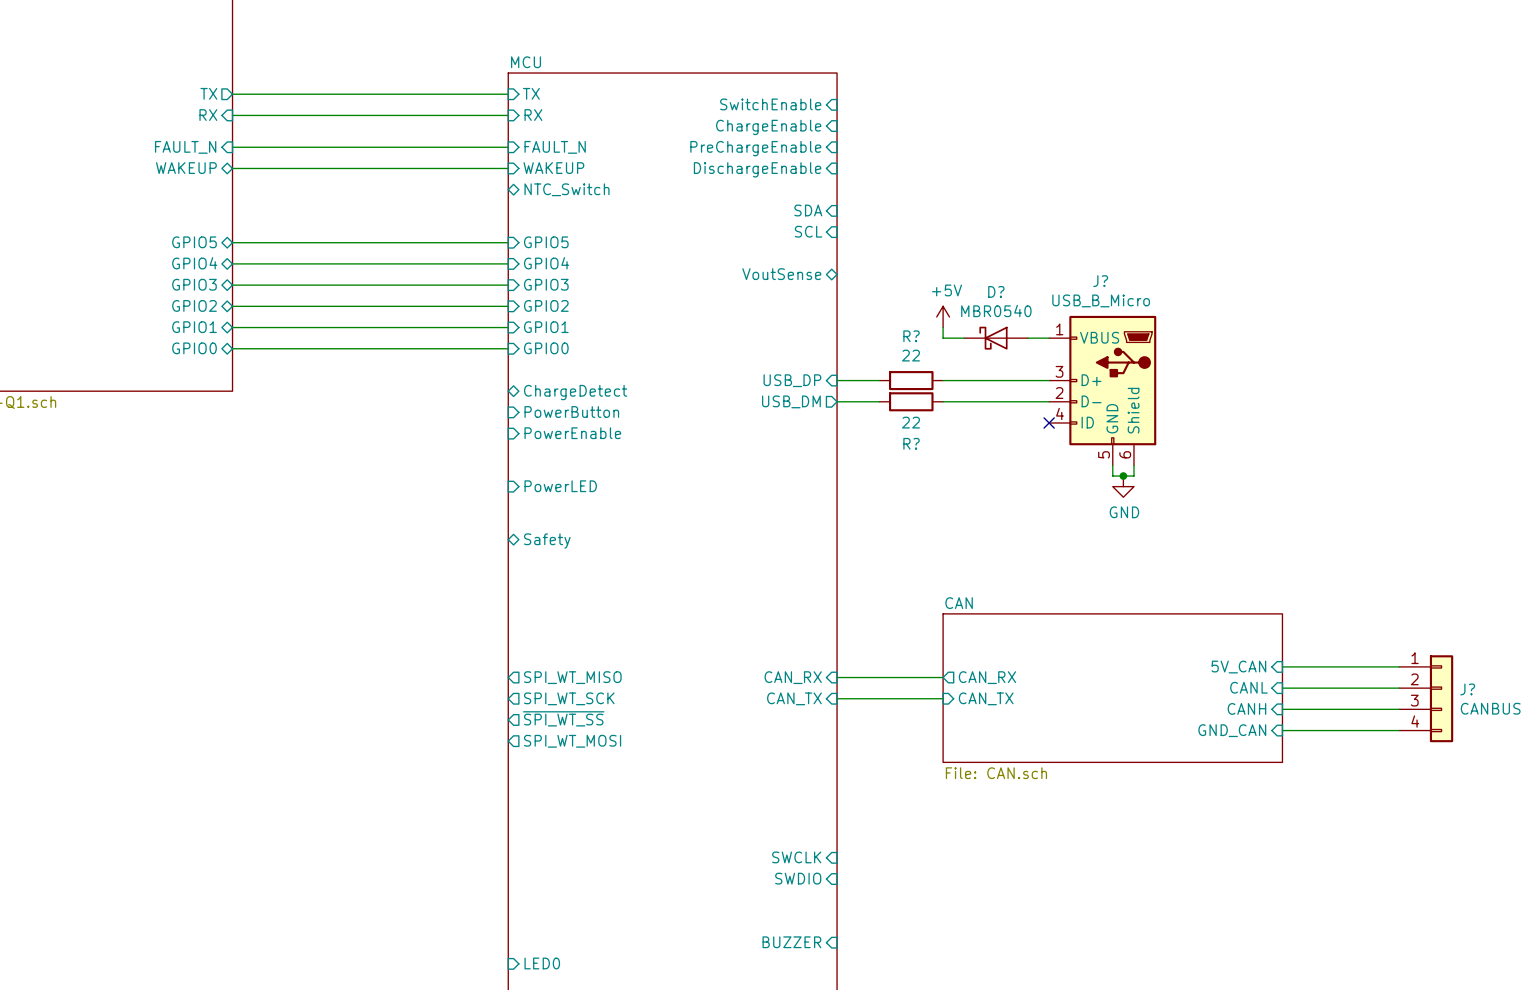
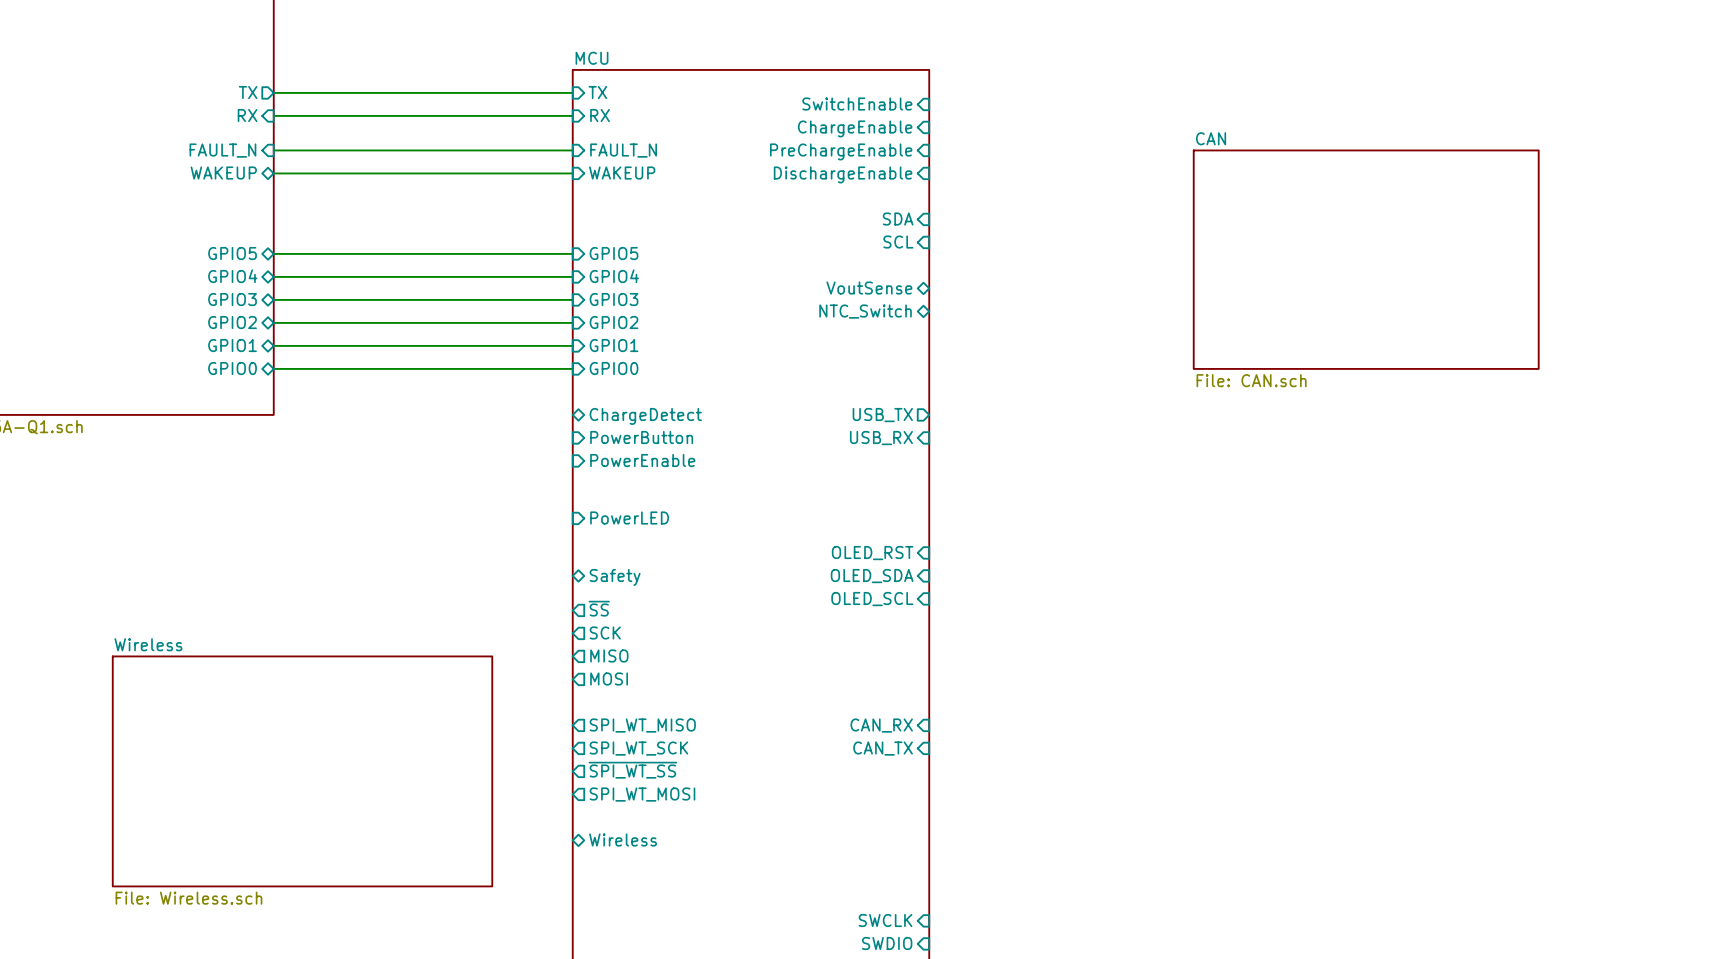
sheet pin: NTC_Switch (567, 189) -> none
sheet CAN: none -> File: CAN.sch (1366, 259)
sheet pin: none -> NTC_Switch (865, 311)
power symbol: +5V (943, 316) -> none
wire: (943, 327) (943, 338) (964, 338) -> none
D?: MBR0540 (996, 338) -> none
wire: (1027, 338) (1049, 338) -> none
sheet pin: USB_DP (792, 380) -> none
wire: (837, 380) (879, 380) -> none
R?: 22 (911, 380) -> none
wire: (943, 380) (1049, 380) -> none
J?: USB_B_Micro (1102, 390) -> none
sheet pin: none -> USB_TX (882, 415)
sheet pin: USB_DM (791, 401) -> none
wire: (837, 401) (879, 401) -> none
R?: 22 (911, 401) -> none
wire: (943, 401) (1049, 401) -> none
sheet pin: none -> USB_RX (881, 438)
no-connect mark: (1049, 423) -> none
wire: (1112, 465) (1112, 476) (1133, 476) (1133, 465) -> none
junction: (1123, 476) -> none
power symbol: GND (1123, 486) -> none
sheet pin: none -> OLED_RST (872, 553)
sheet pin: none -> OLED_SDA (872, 576)
sheet pin: none -> OLED_SCL (872, 599)
sheet pin: none -> ~{SS} (599, 608)
sheet pin: none -> SCK (605, 633)
sheet pin: none -> MISO (609, 656)
sheet pin: none -> MOSI (609, 679)
wire: (1282, 666) (1399, 666) -> none
sheet pin: 5V_CAN (1238, 667) -> none
wire: (837, 677) (943, 677) -> none
sheet pin: CAN_RX (987, 677) -> none
sheet pin: CANL (1248, 687) -> none
sheet CAN: File: CAN.sch (1112, 688) -> none
wire: (1282, 688) (1399, 688) -> none
wire: (837, 698) (943, 698) -> none
sheet pin: CAN_TX (986, 698) -> none
J?: CANBUS (1426, 698) -> none
sheet pin: CANH (1246, 708) -> none
wire: (1282, 709) (1399, 709) -> none
sheet Wireless: none -> File: Wireless.sch (302, 771)
sheet pin: GND_CAN (1232, 730) -> none
wire: (1282, 730) (1399, 730) -> none
sheet pin: none -> Wireless (623, 839)

